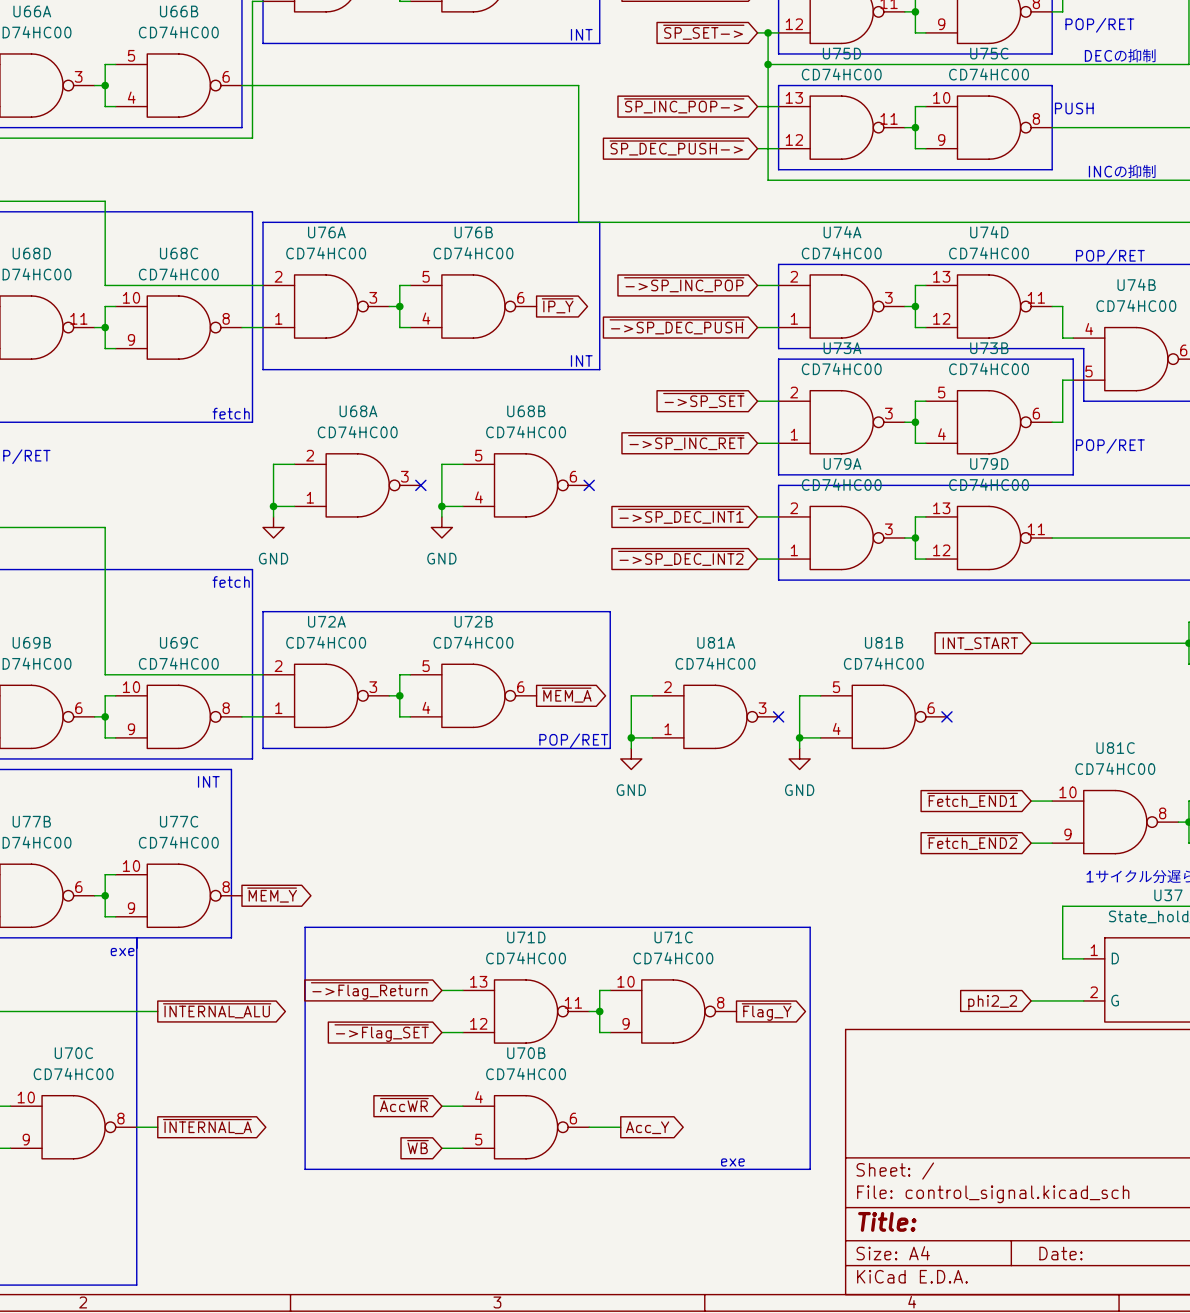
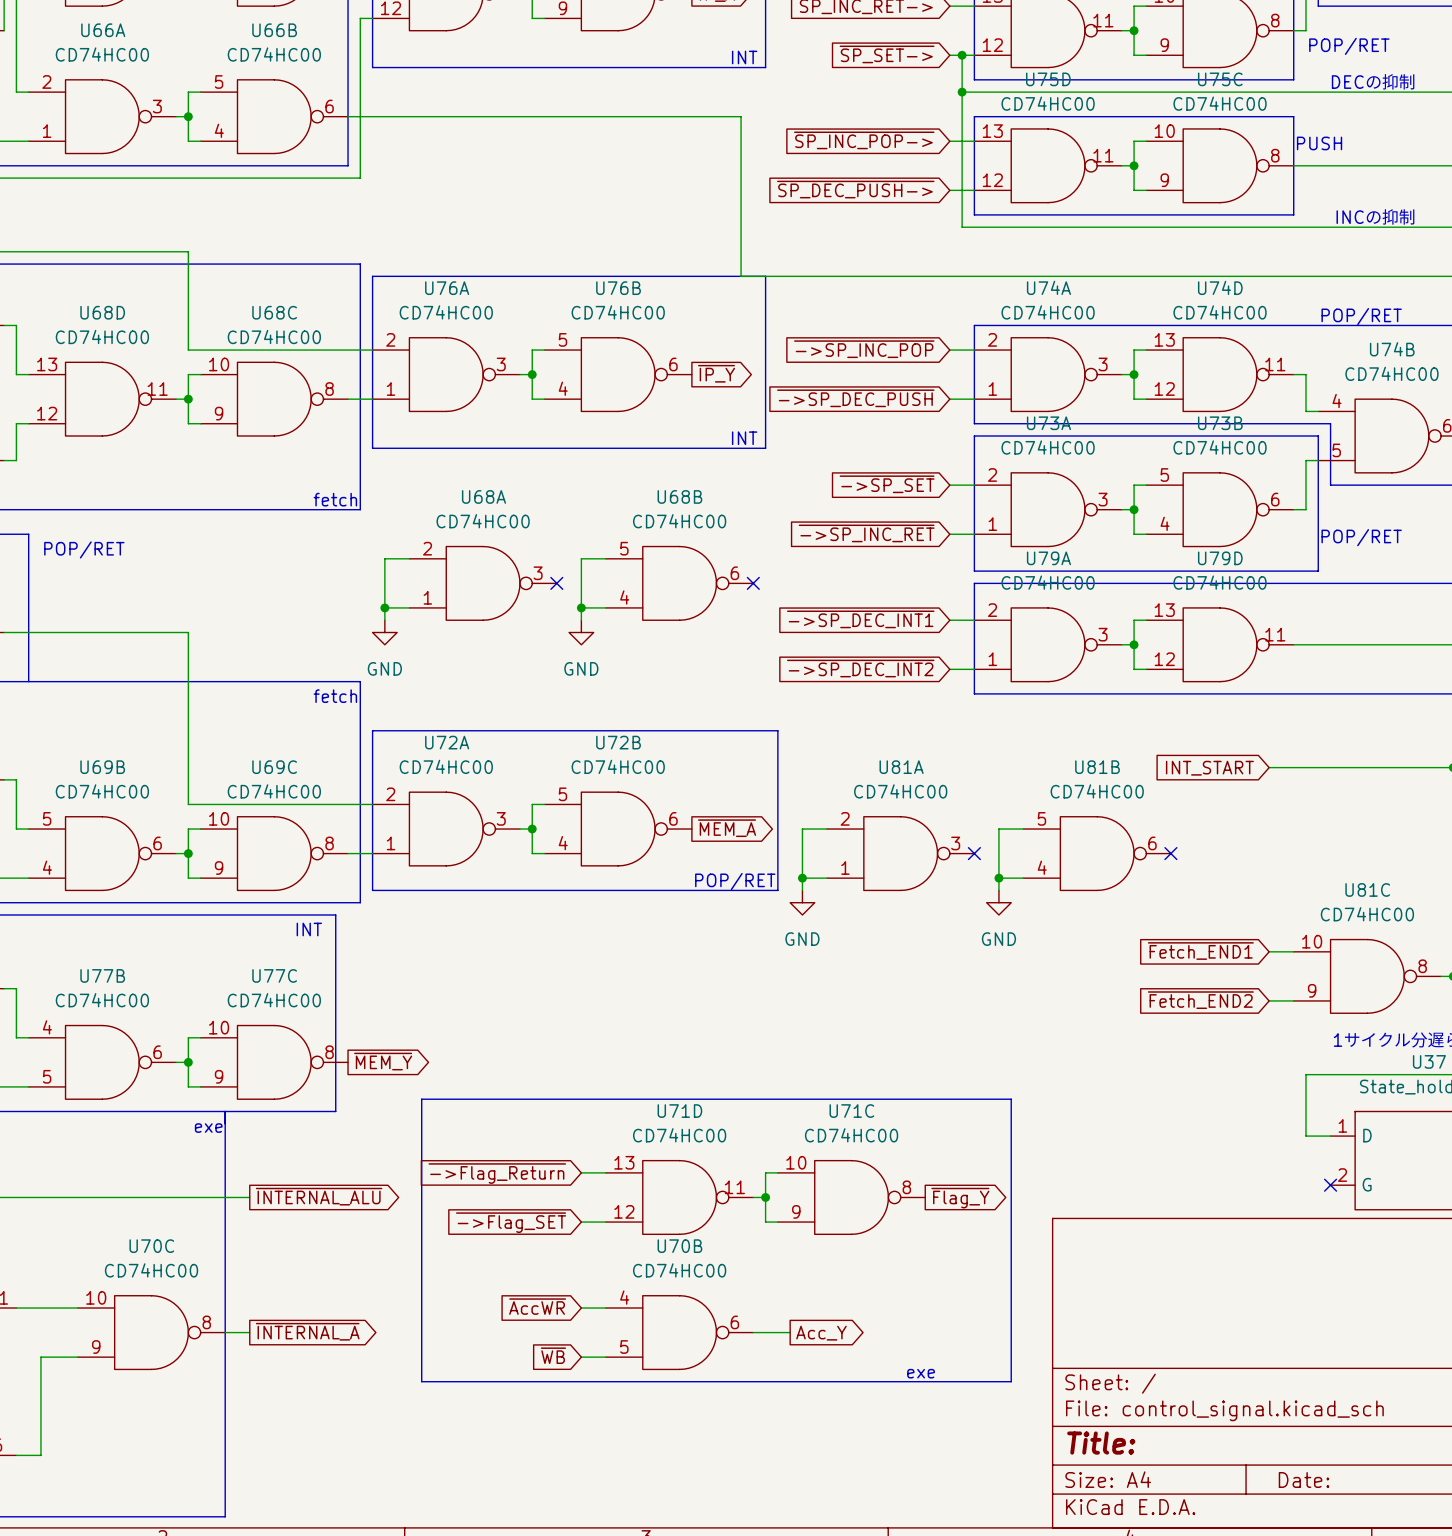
wire: (1031, 1000) (1083, 1000) -> none
no-connect mark: none -> (1330, 1185)
global label: phi2_2 (992, 1002) -> none

